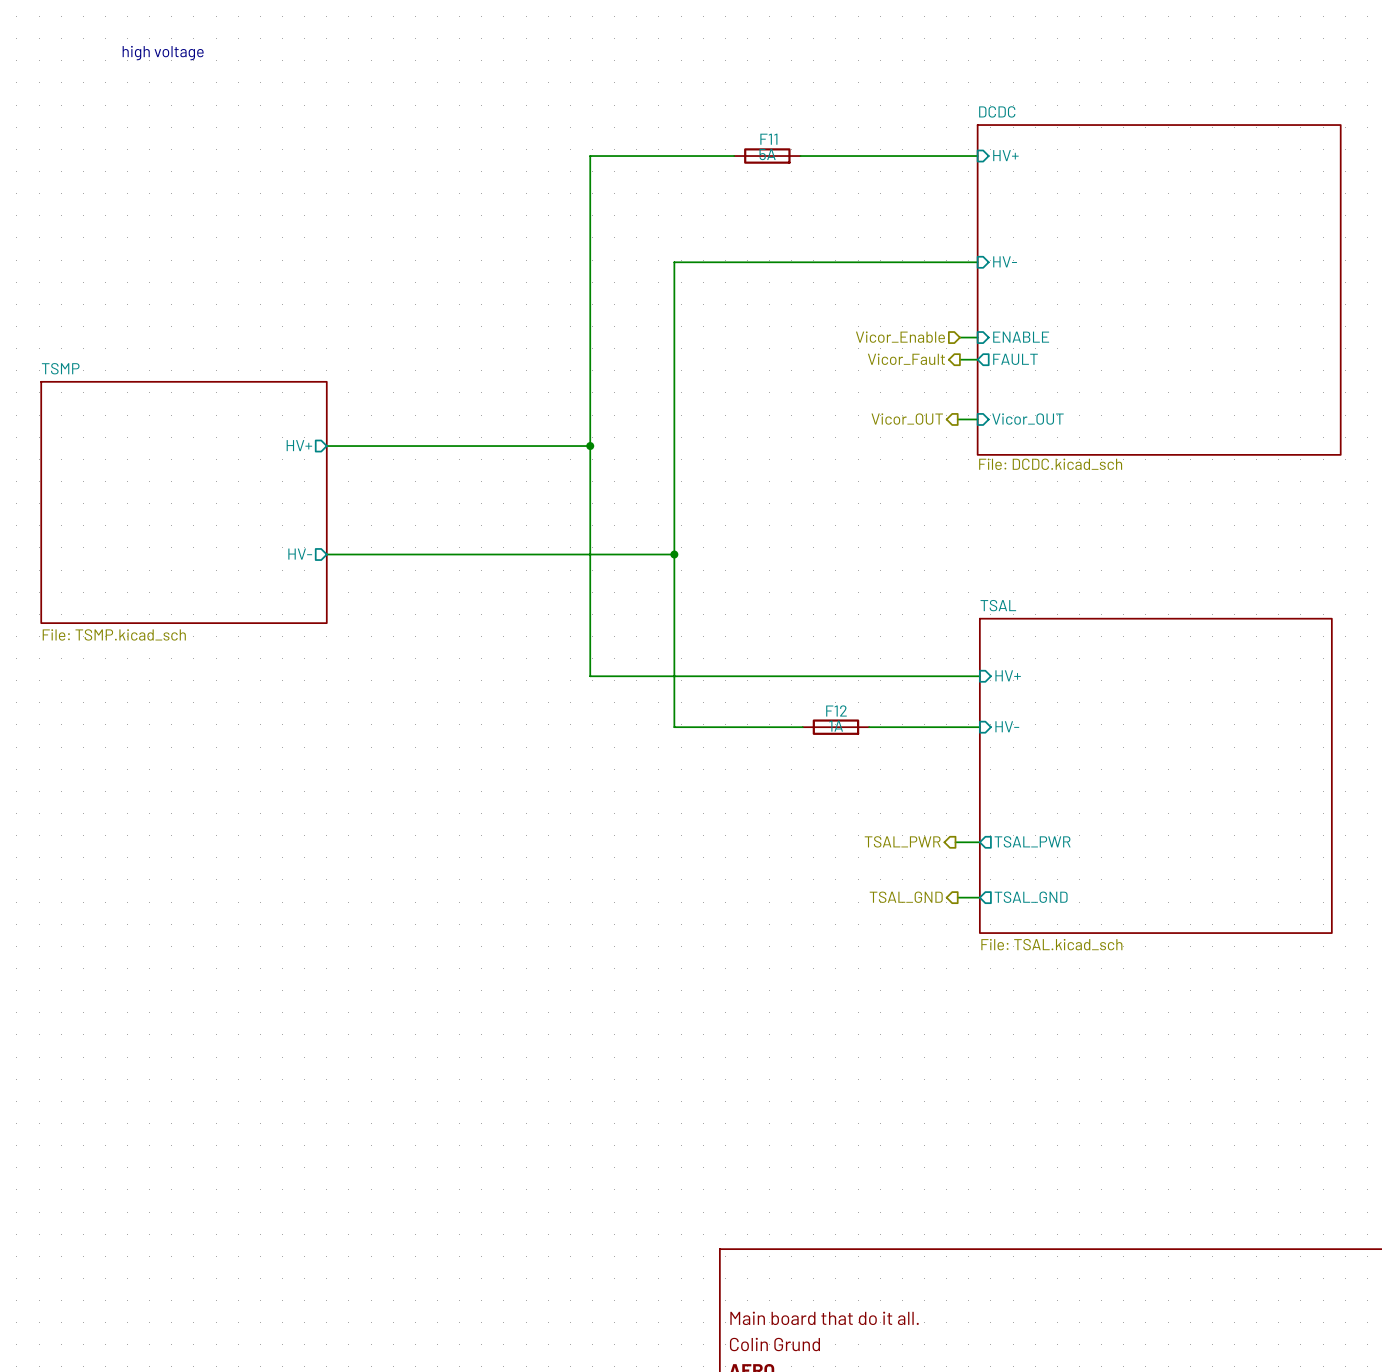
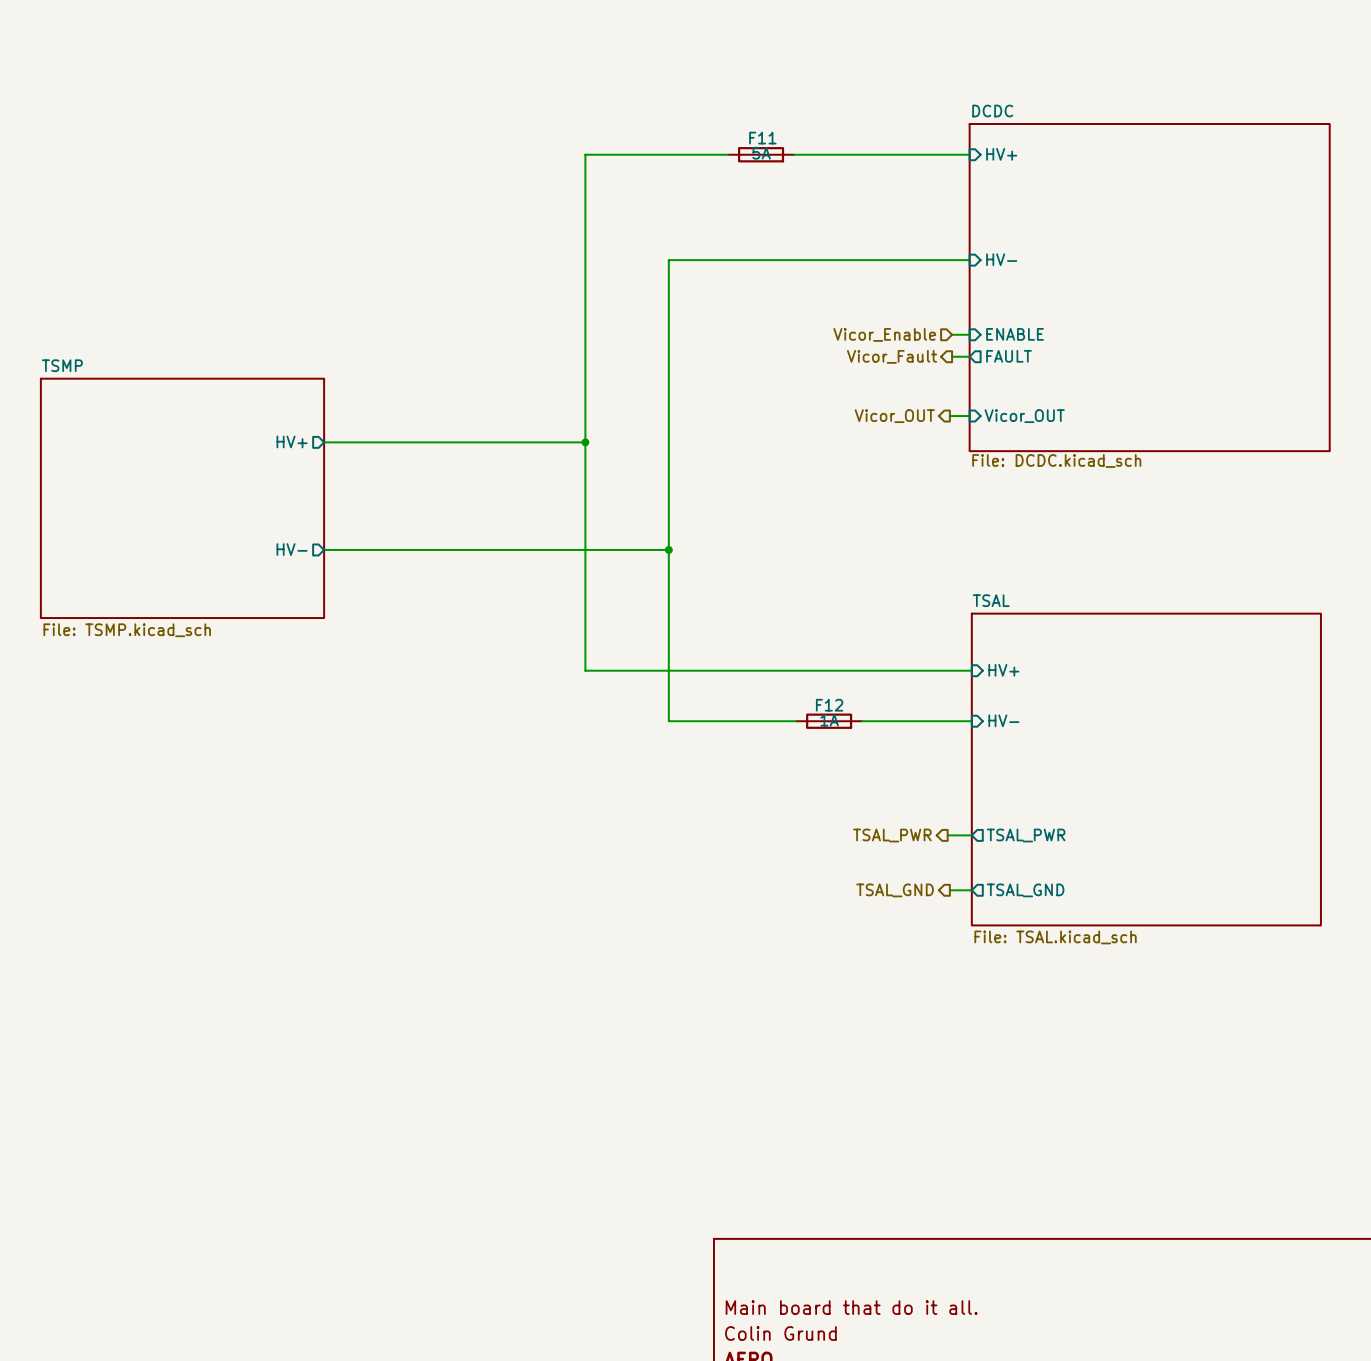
text: high voltage (163, 53) -> none

